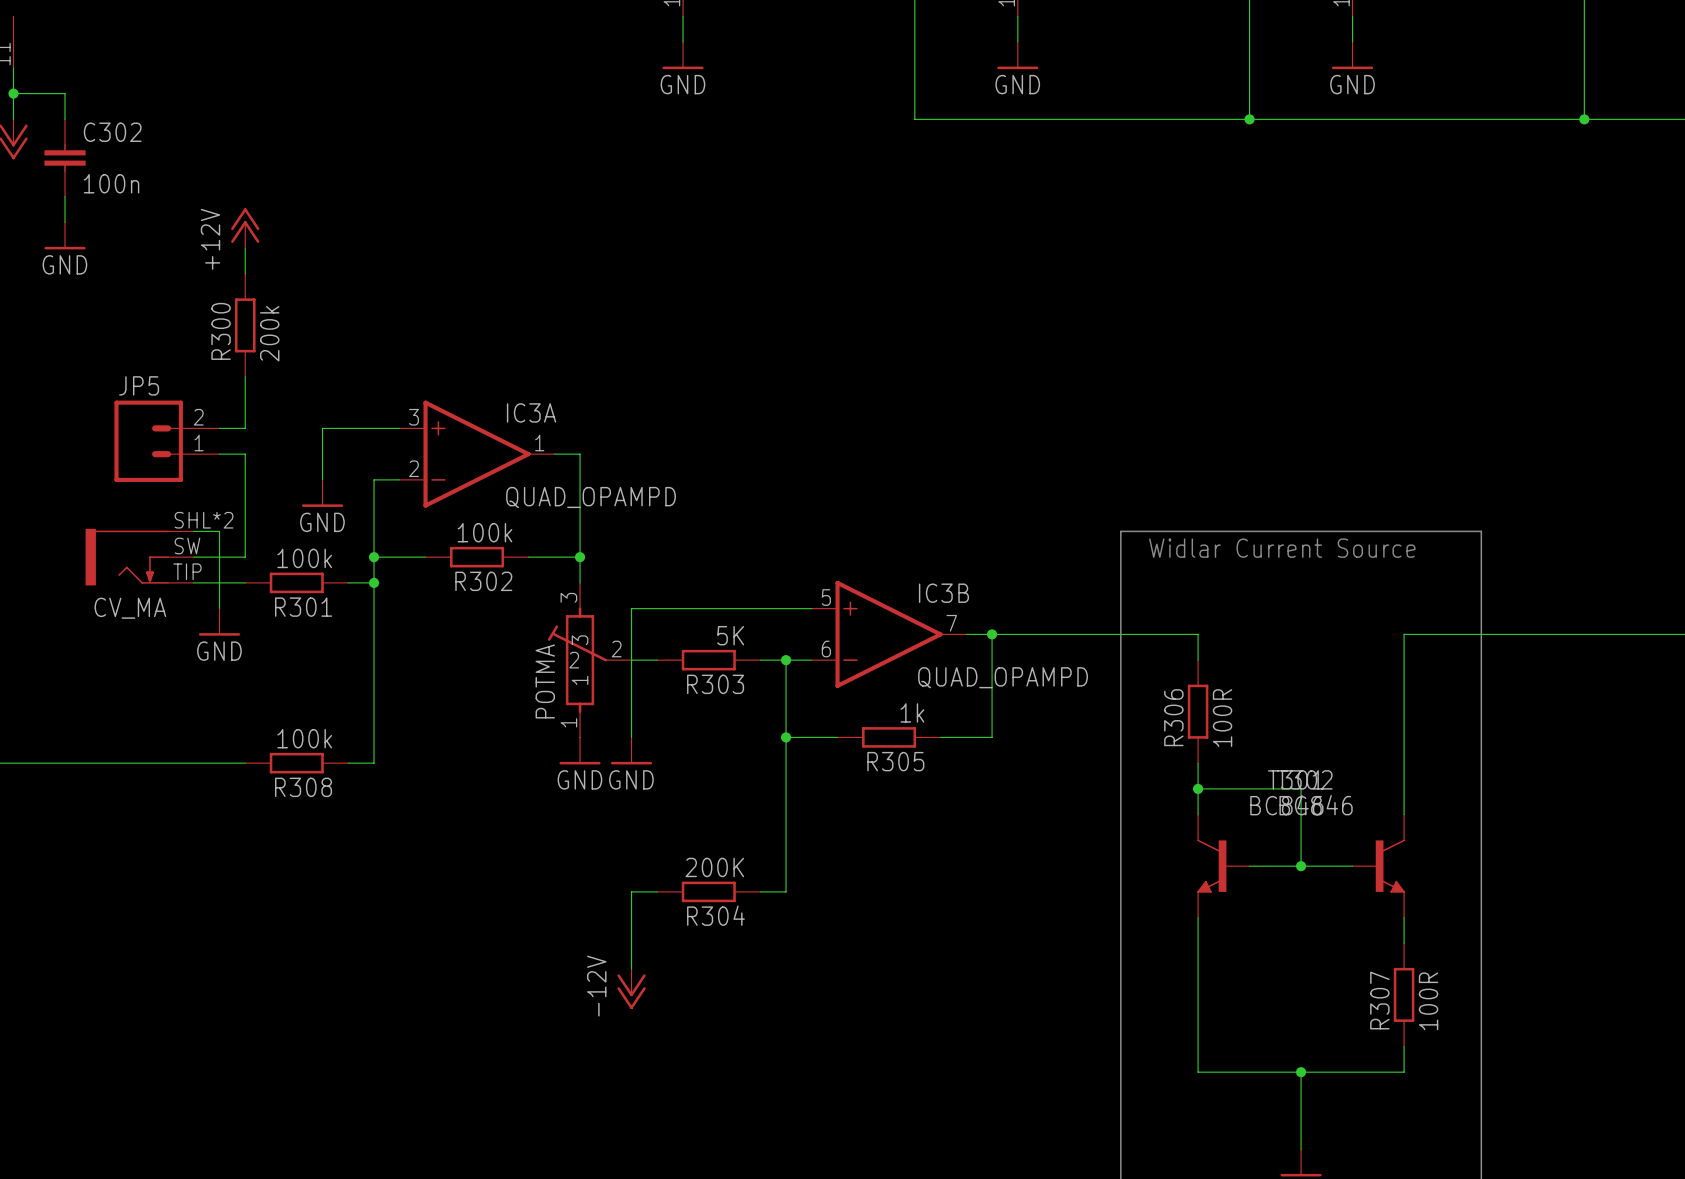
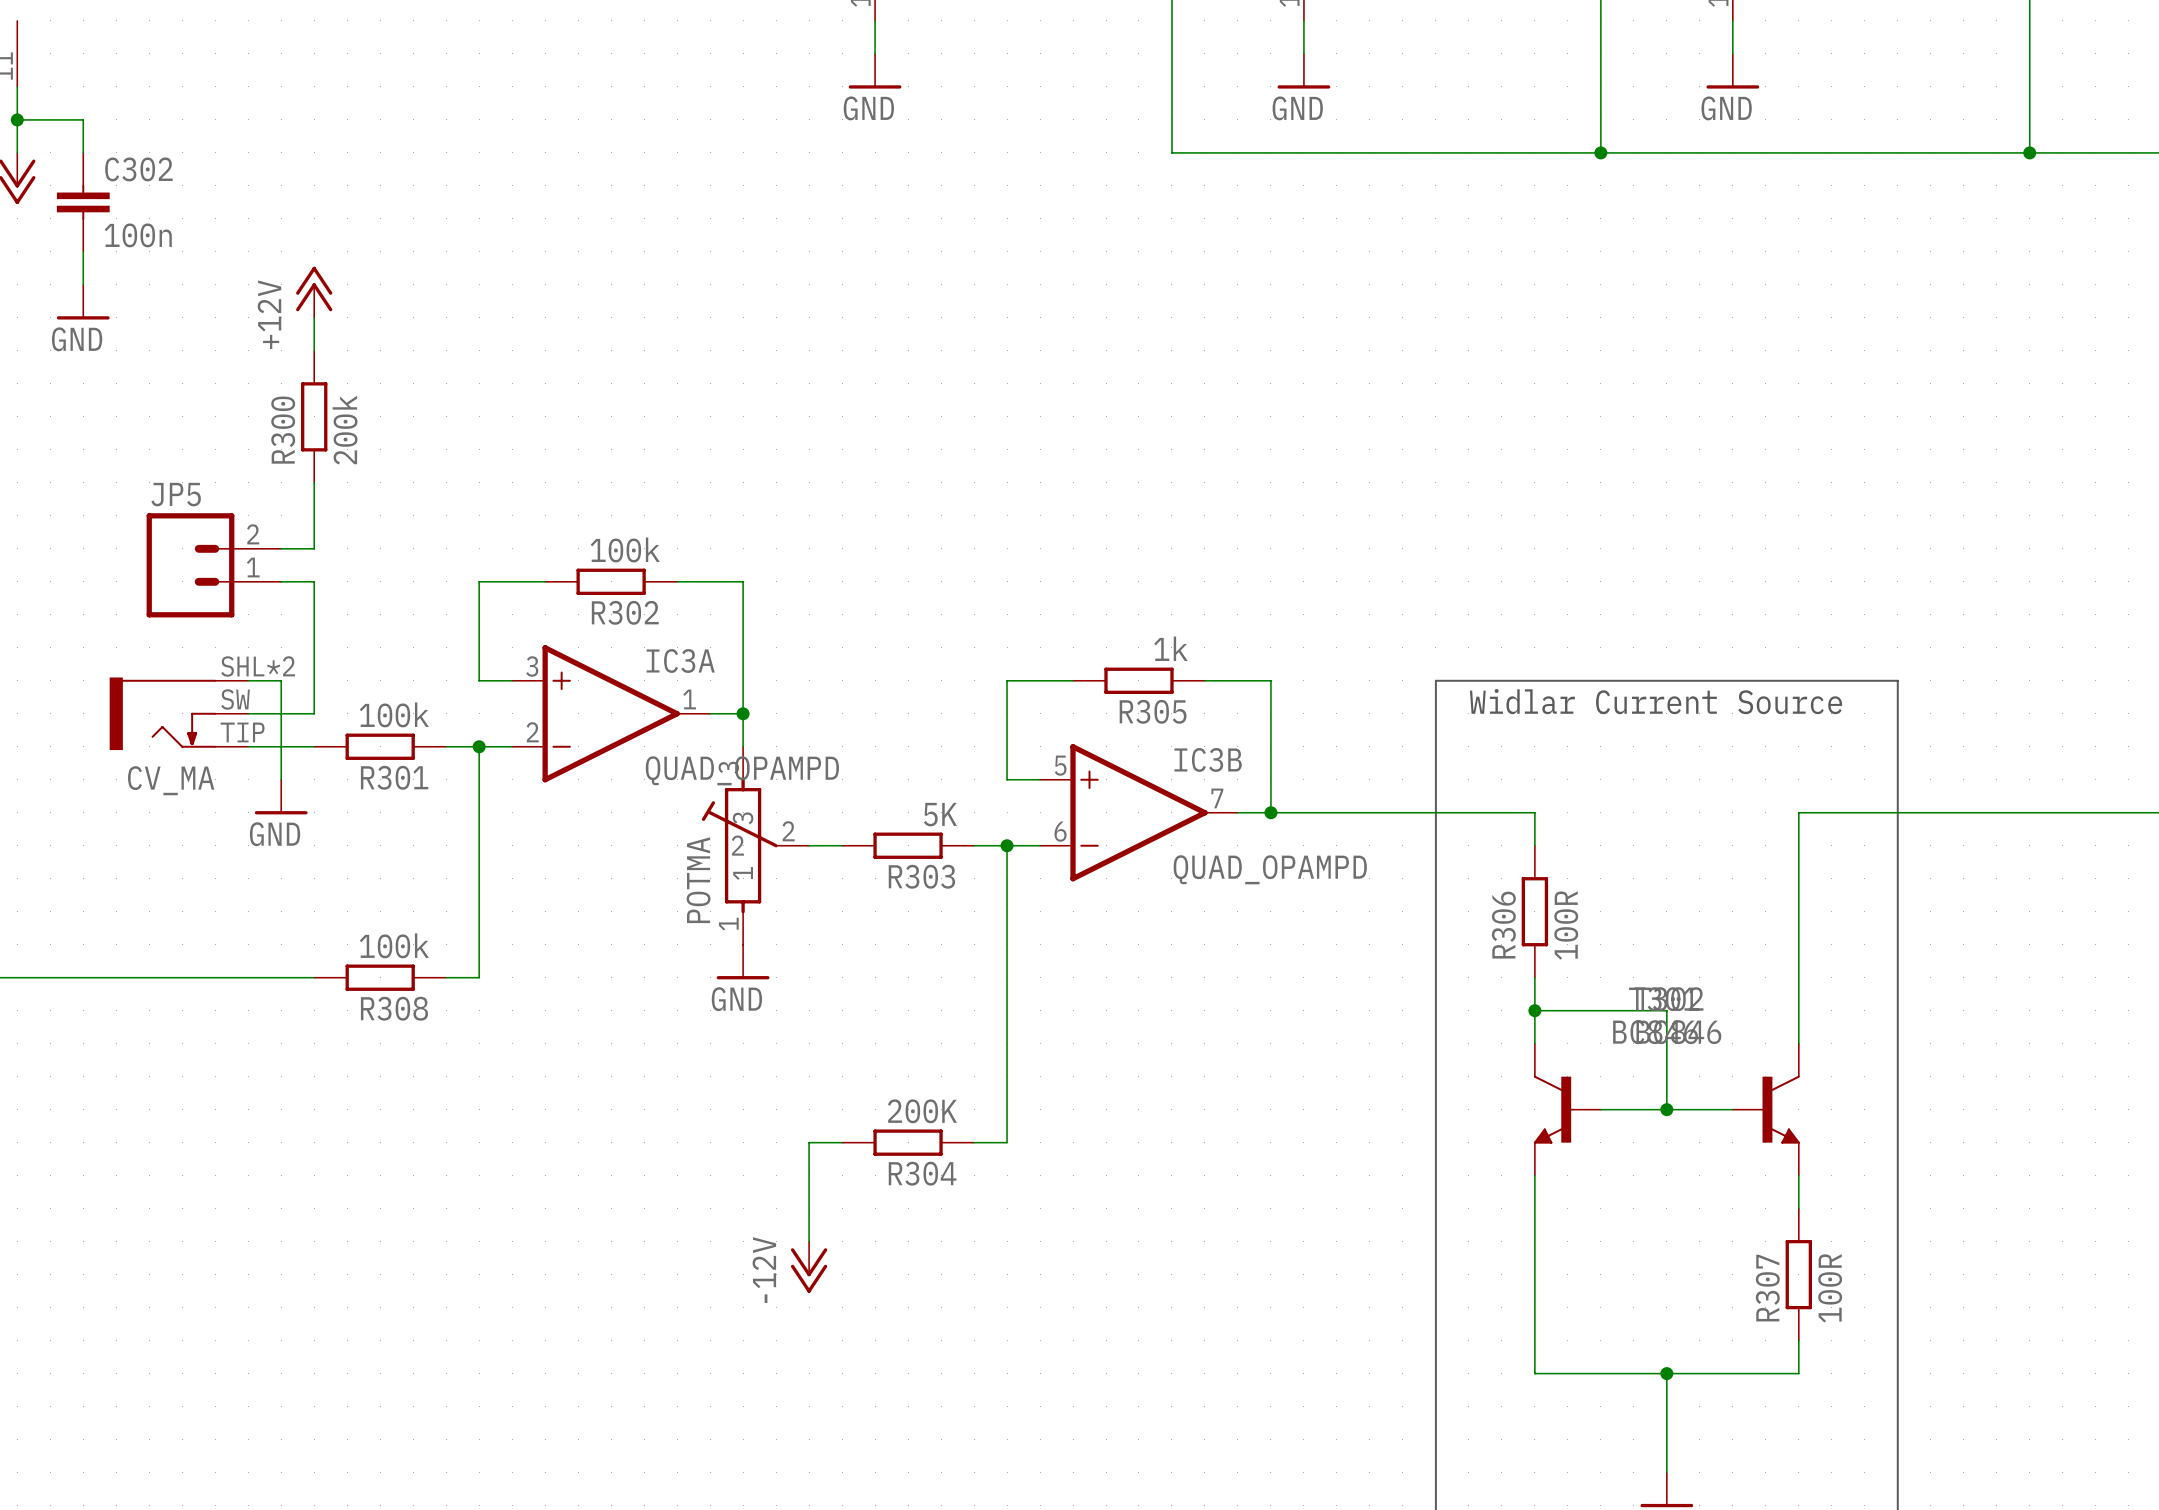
wire: (399, 428) (322, 428) (322, 479) -> none
IC3A position: (477, 454) -> (611, 713)
wire: (374, 479) (399, 479) -> (479, 614) (479, 581) (545, 581)
power symbol: GND (322, 493) -> none
wire: (374, 531) (374, 582) -> (479, 680) (512, 680)
wire: (374, 557) (425, 557) -> none
junction: (374, 557) -> none
R302 position: (477, 557) -> (611, 581)
wire: none -> (479, 746) (512, 746)
wire: (786, 608) (631, 608) (631, 737) -> (1007, 779) (1007, 680) (1073, 680)
wire: (992, 634) (992, 737) (940, 737) -> (1270, 812) (1270, 680) (1204, 680)
wire: (786, 737) (837, 737) -> none
junction: (786, 737) -> none
R305 position: (889, 737) -> (1138, 680)
power symbol: GND (631, 750) -> none

